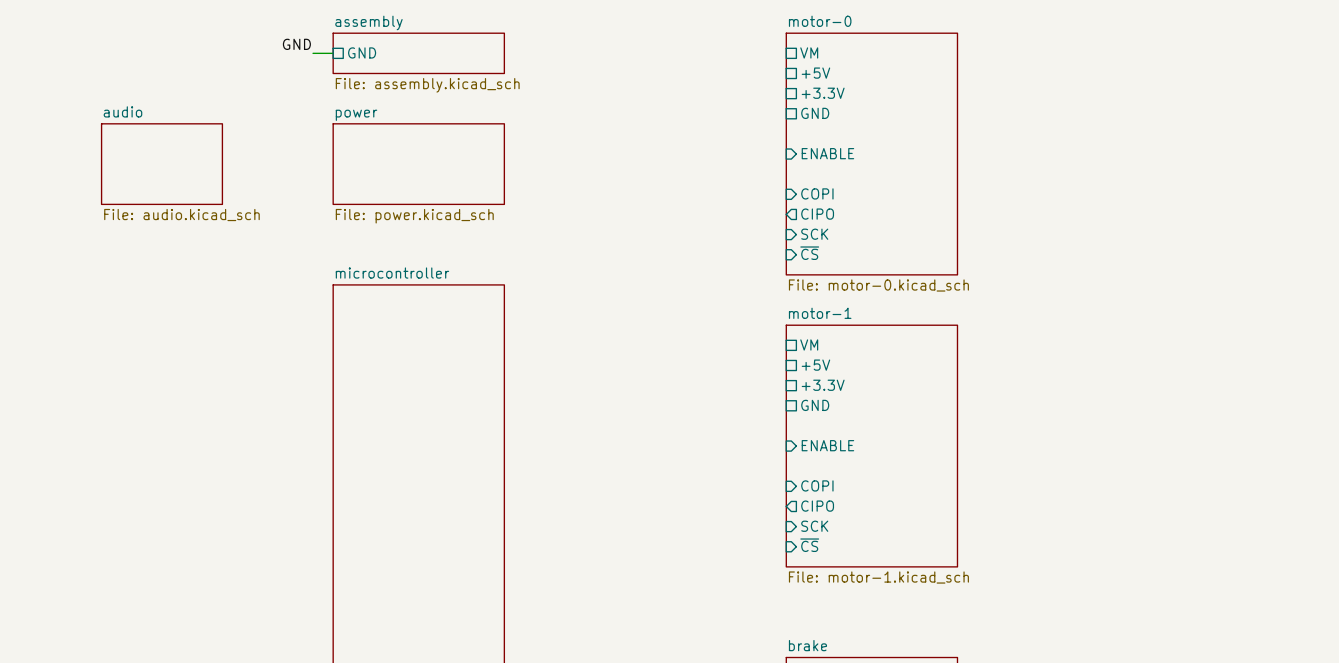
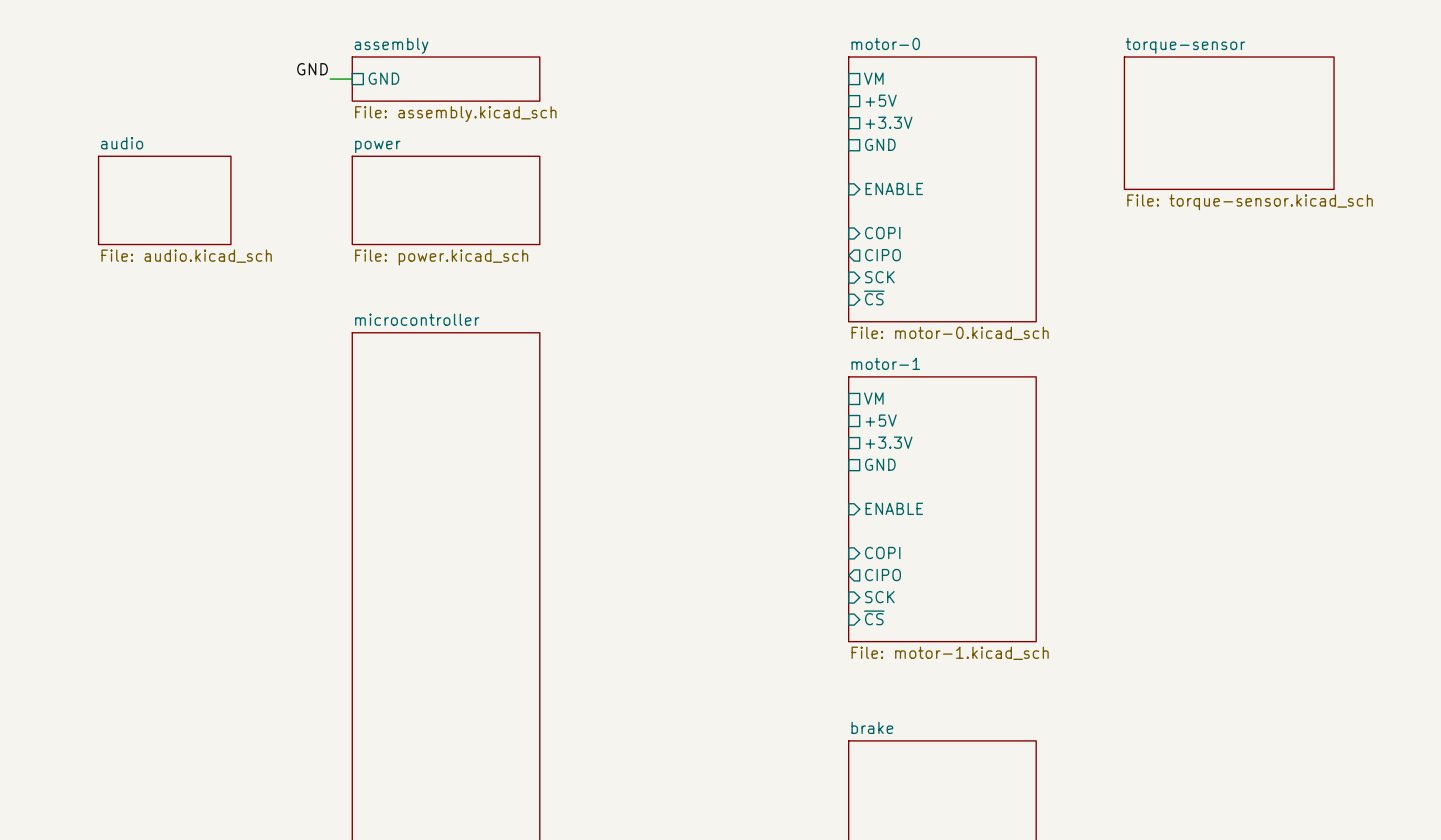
sheet torque-sensor: none -> File: torque-sensor.kicad_sch (1229, 123)

